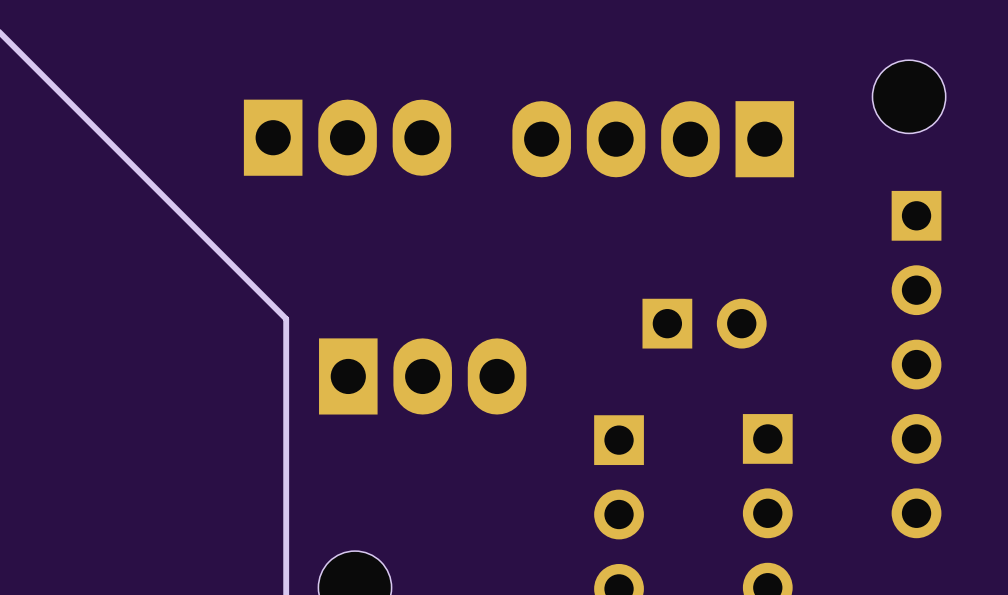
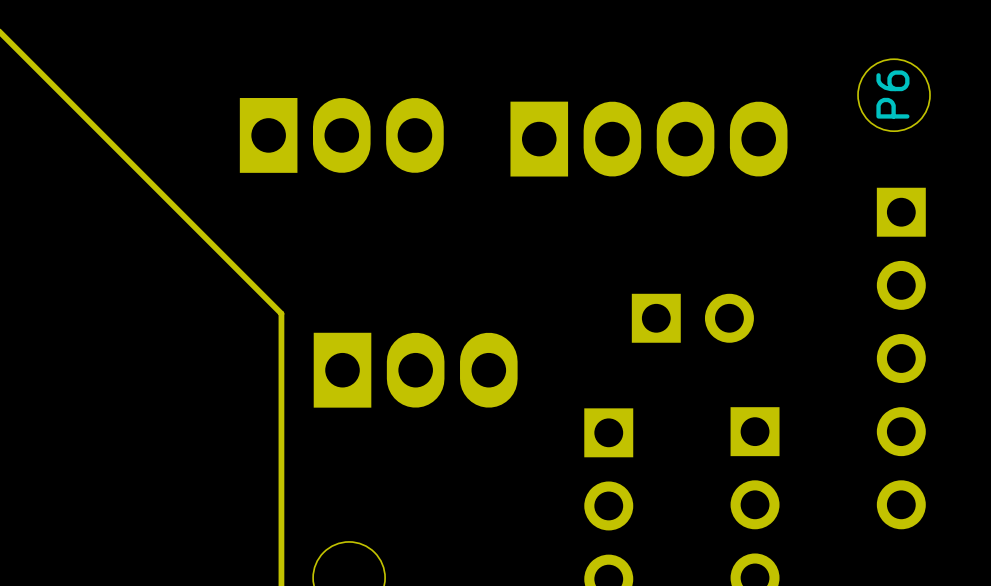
P6 name: none -> P6 (892, 94)
part rotation: 0° (653, 139) -> 180° (648, 139)

